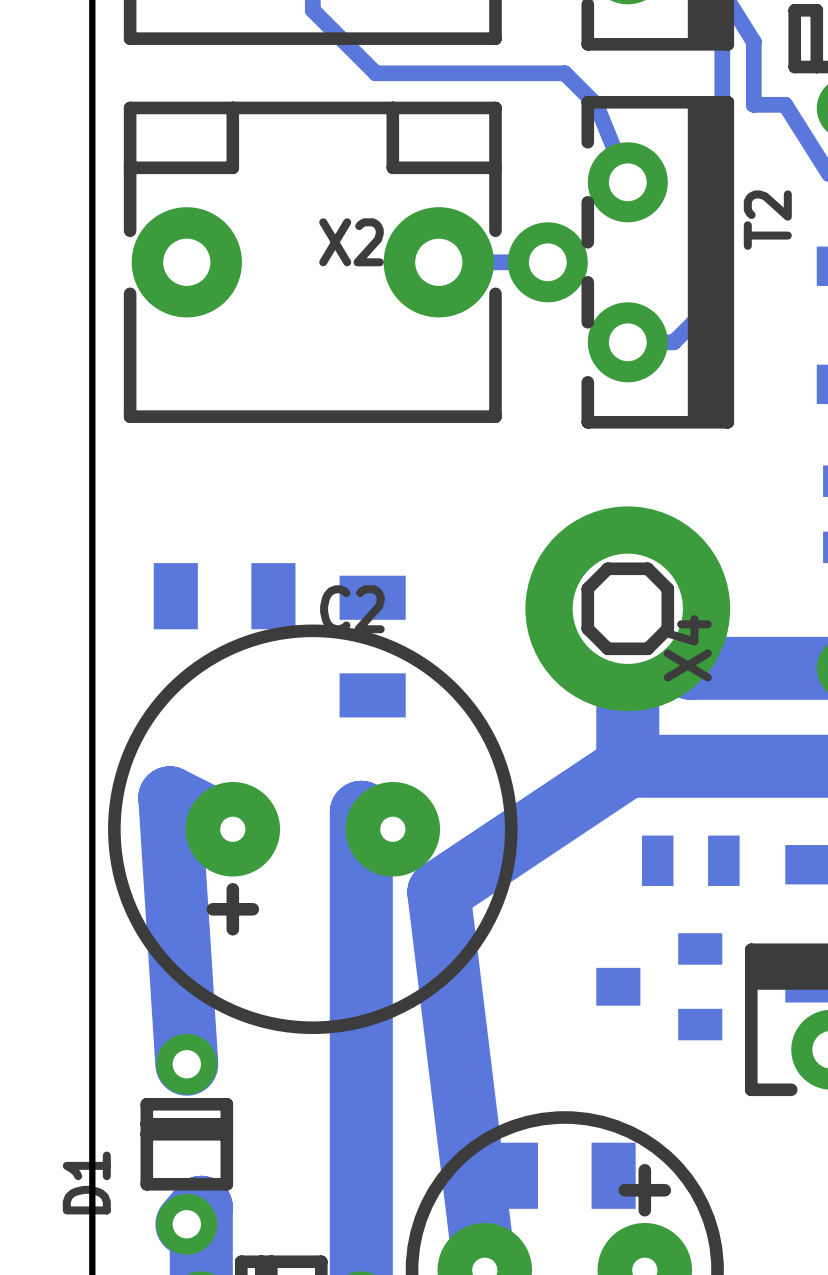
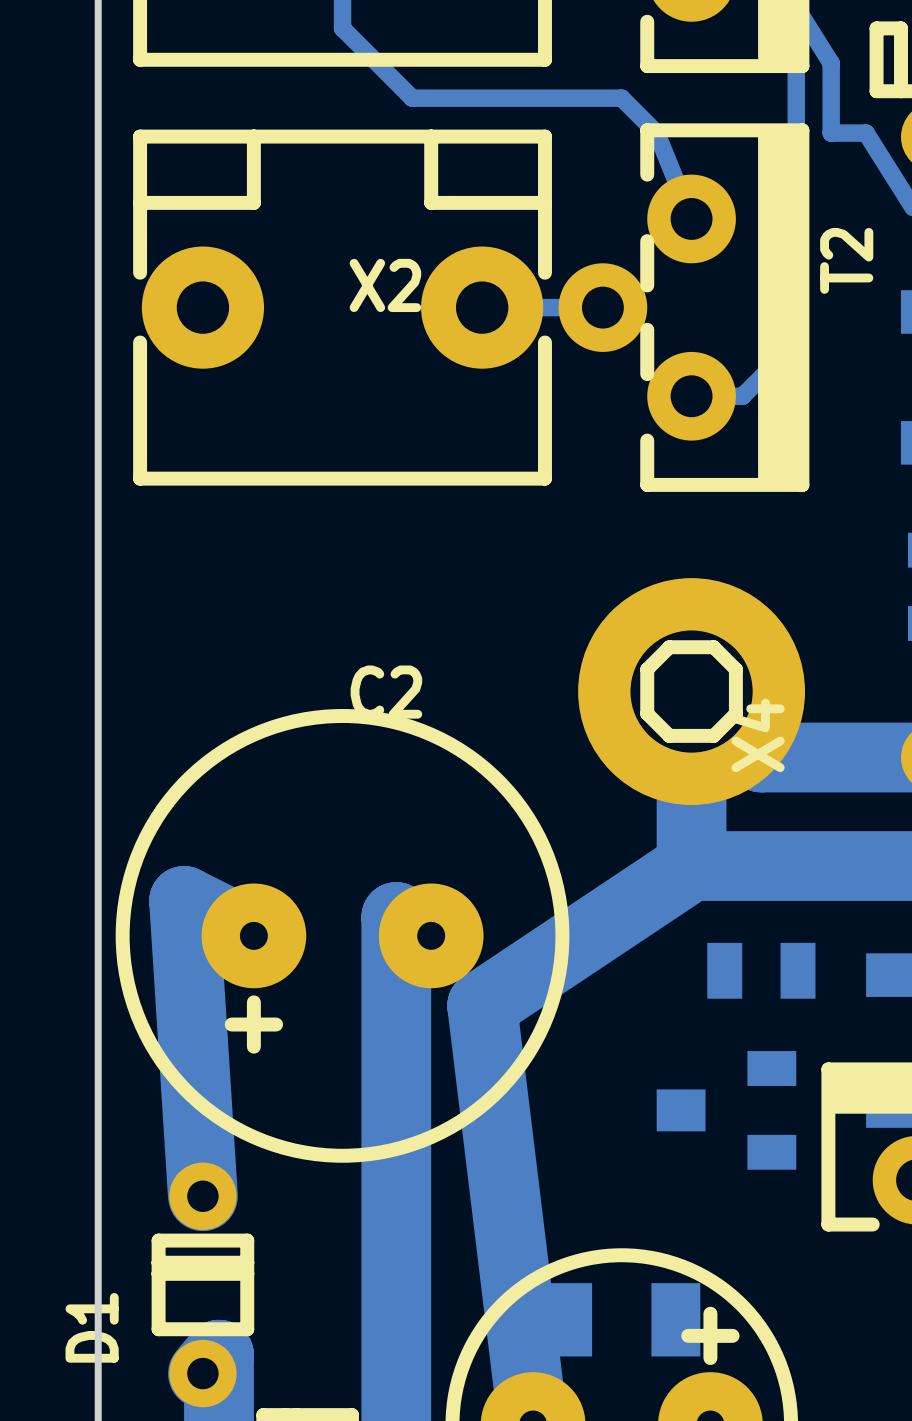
part: (224, 596) -> none
part: (372, 646) -> none

